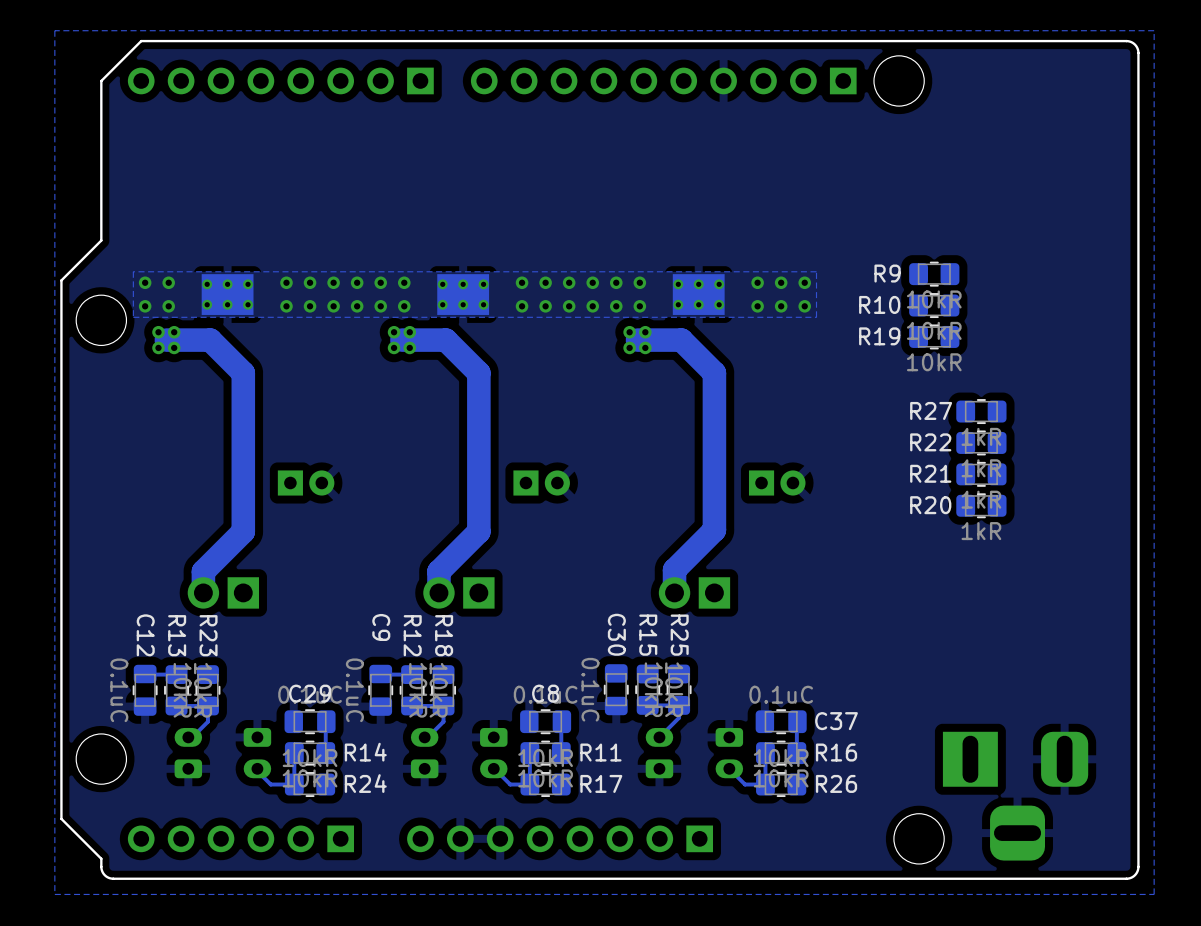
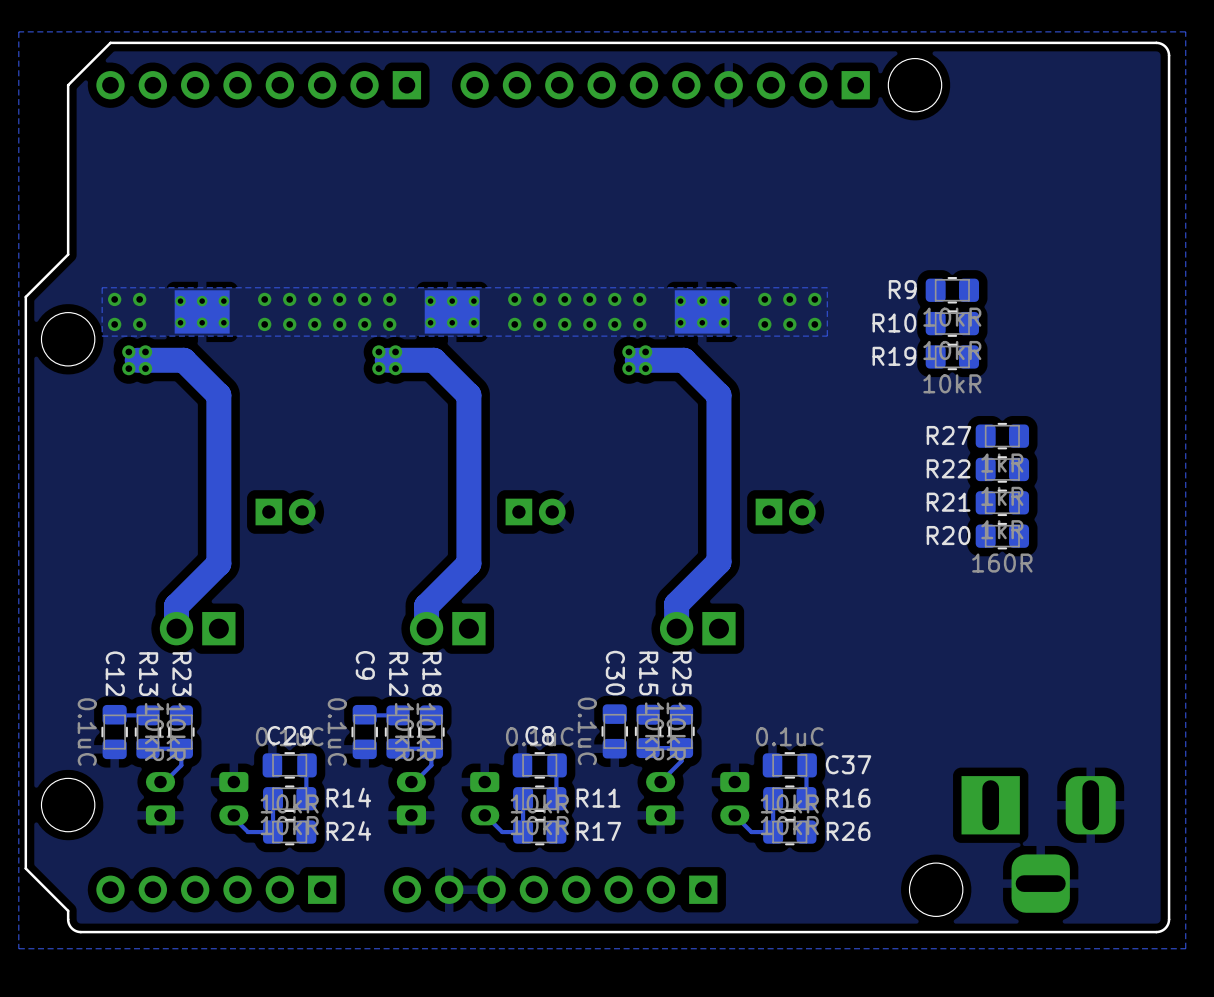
R20 value: 1kR (981, 531) -> 160R (1002, 563)

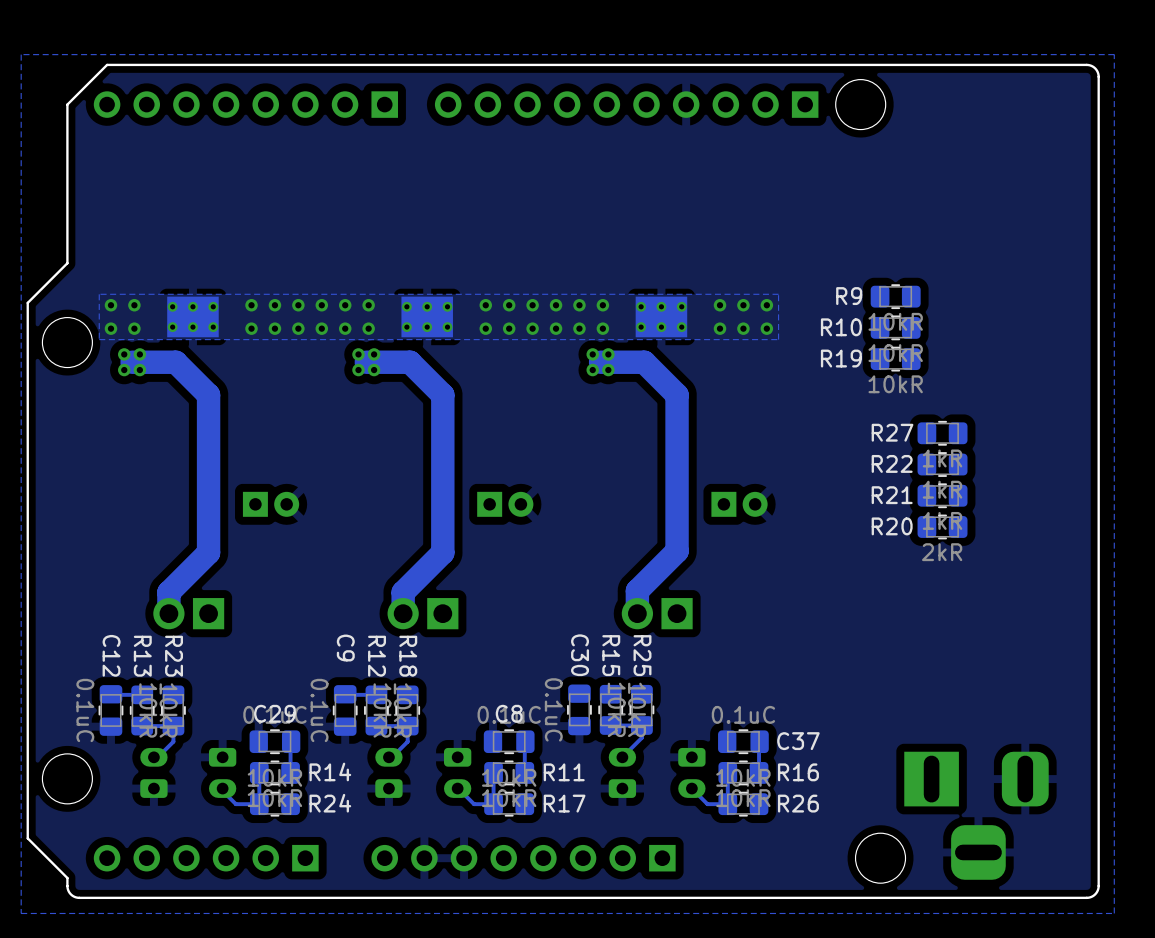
R20 value: 160R (1002, 563) -> 2kR (942, 552)

